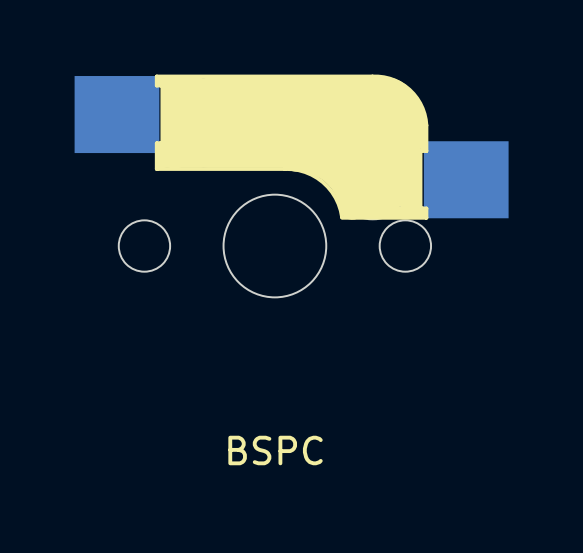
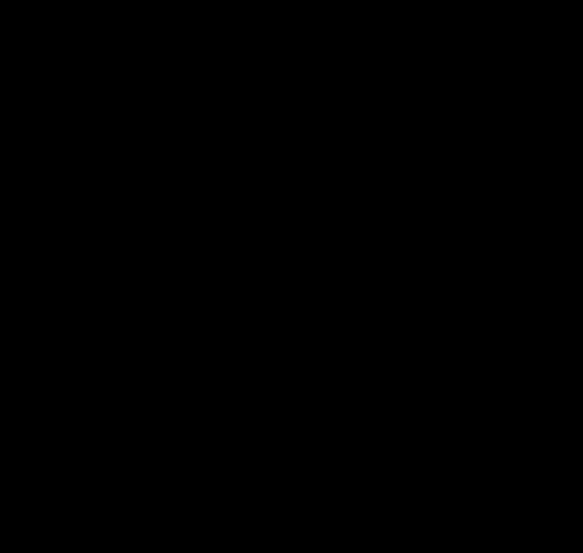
BSPC: (291, 185) -> none

